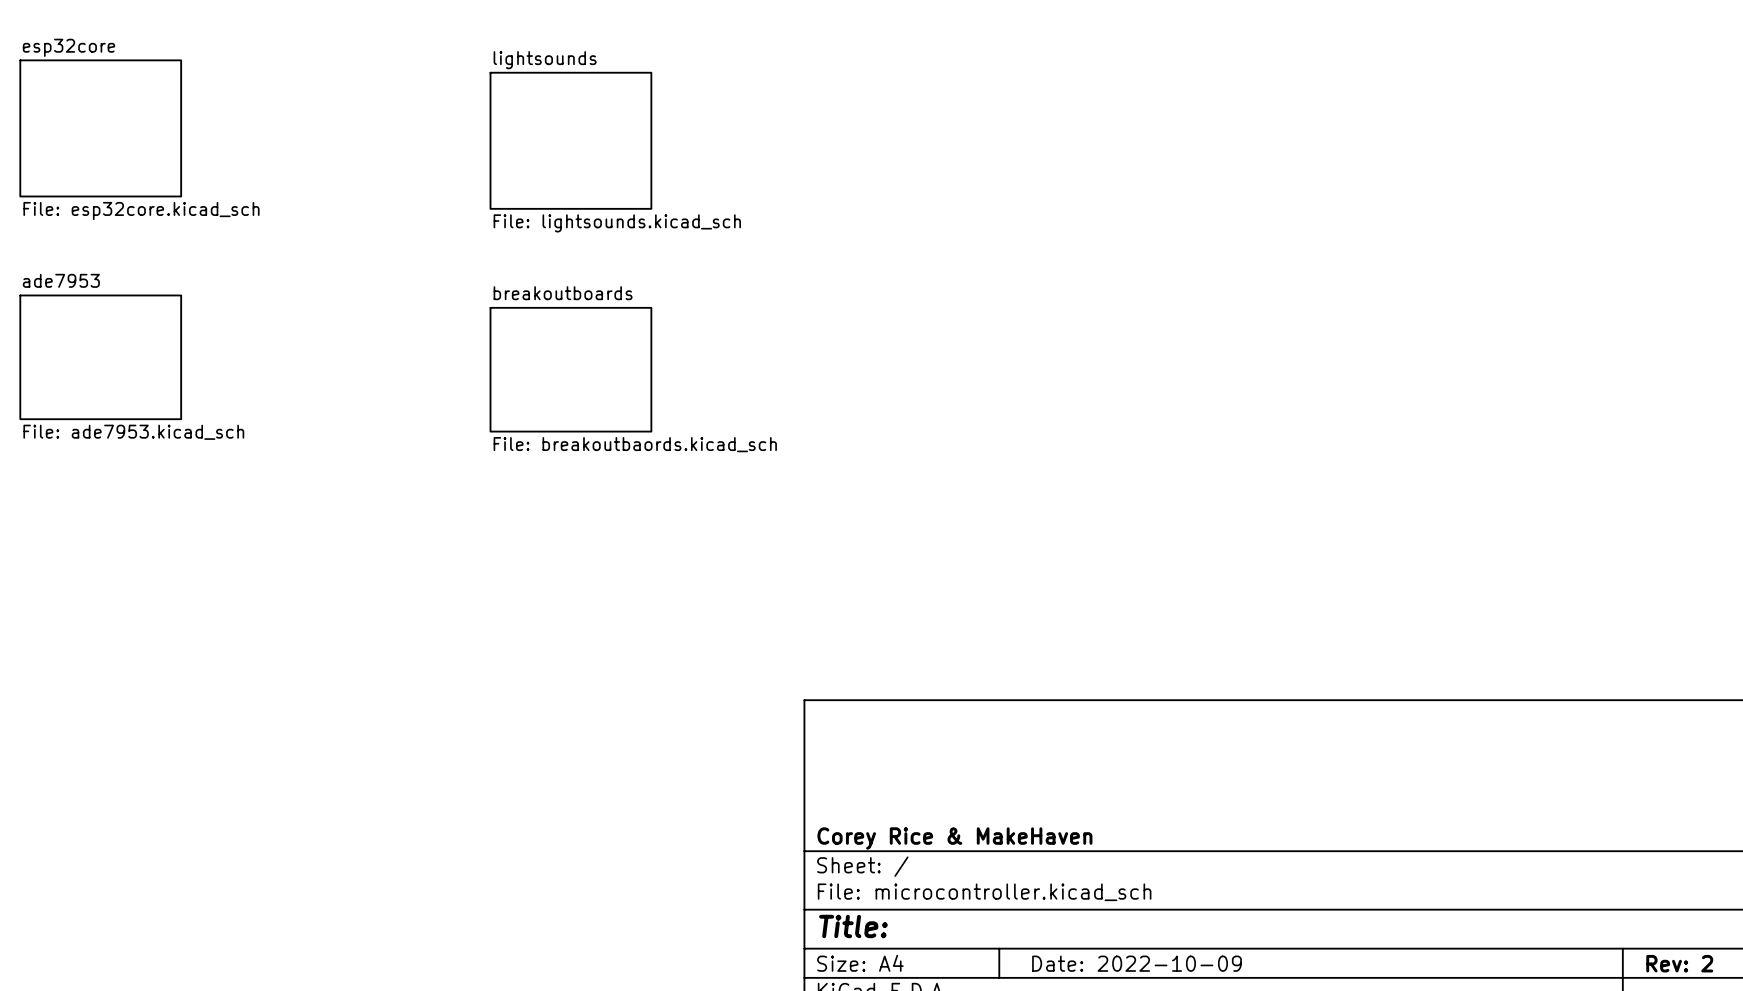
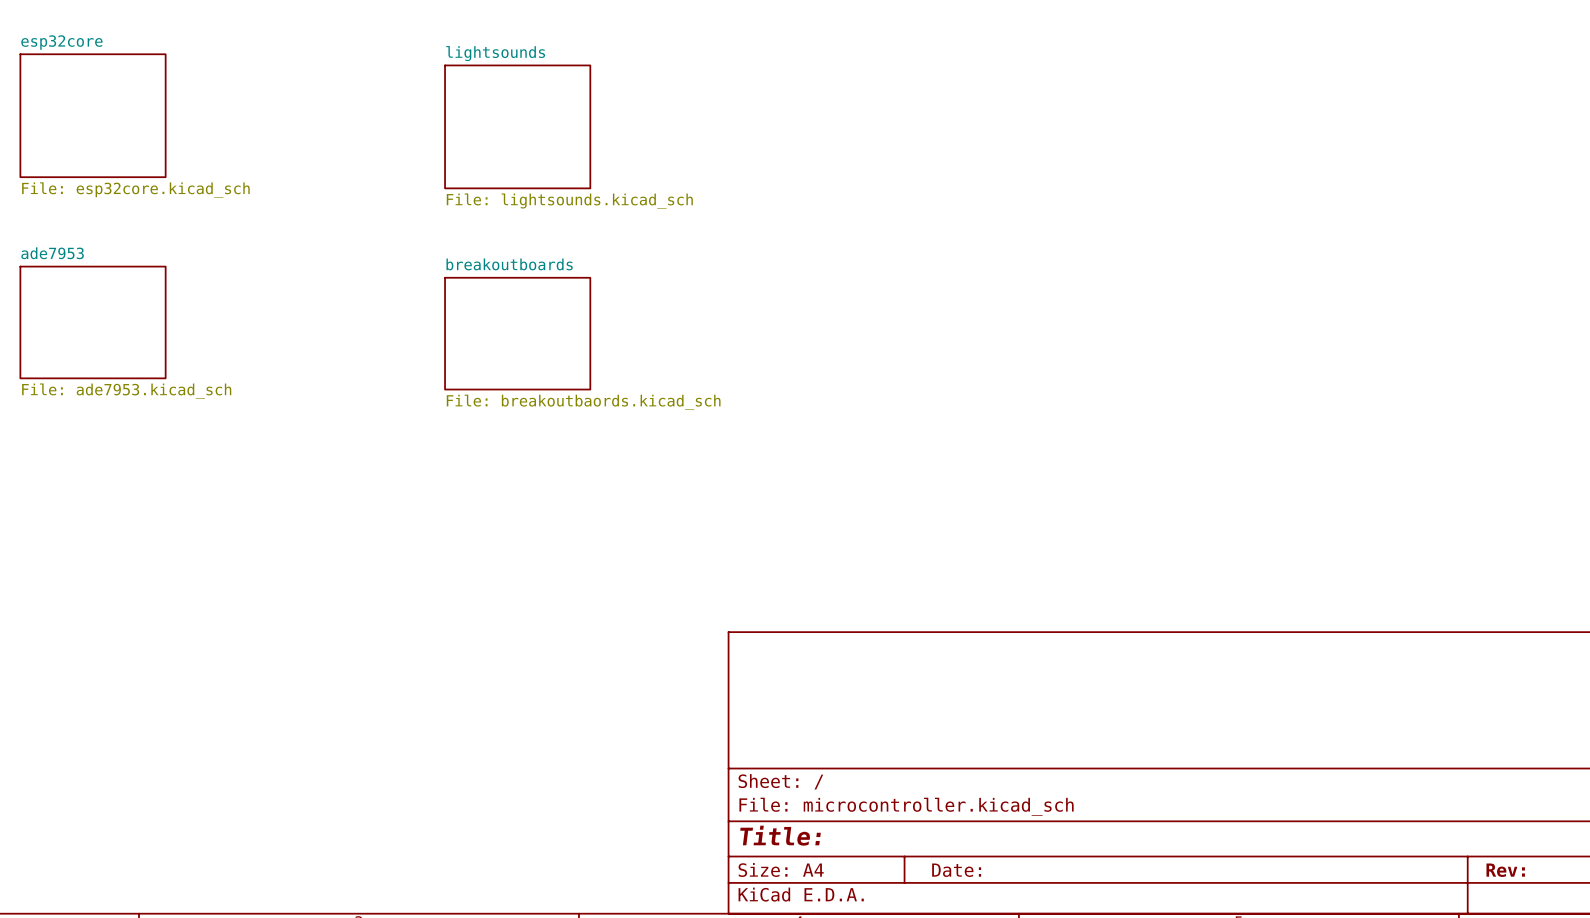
title block: Corey Rice & MakeHaven (954, 838) -> none
title block: Date: 2022-10-09 (1137, 963) -> Date: (956, 870)
title block: Rev: 2 (1679, 963) -> Rev: (1505, 870)

